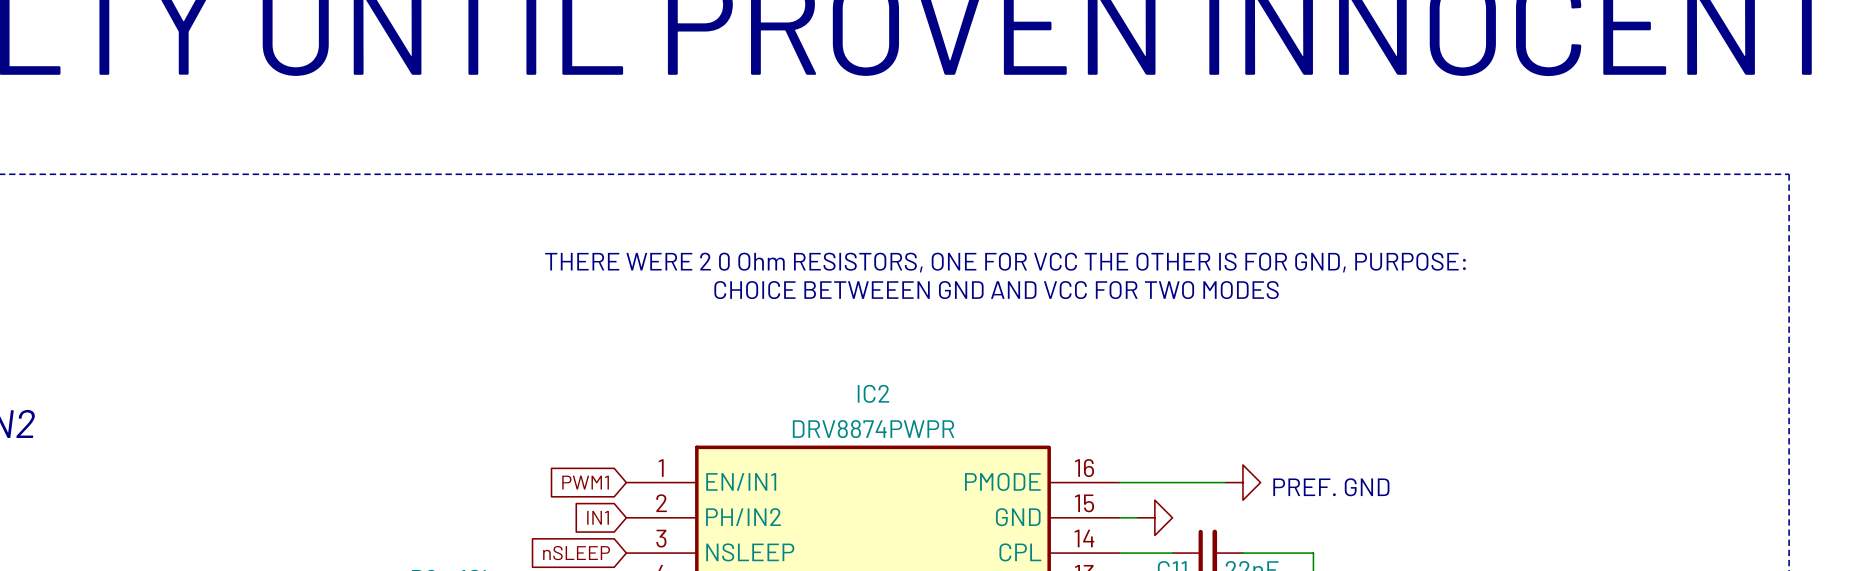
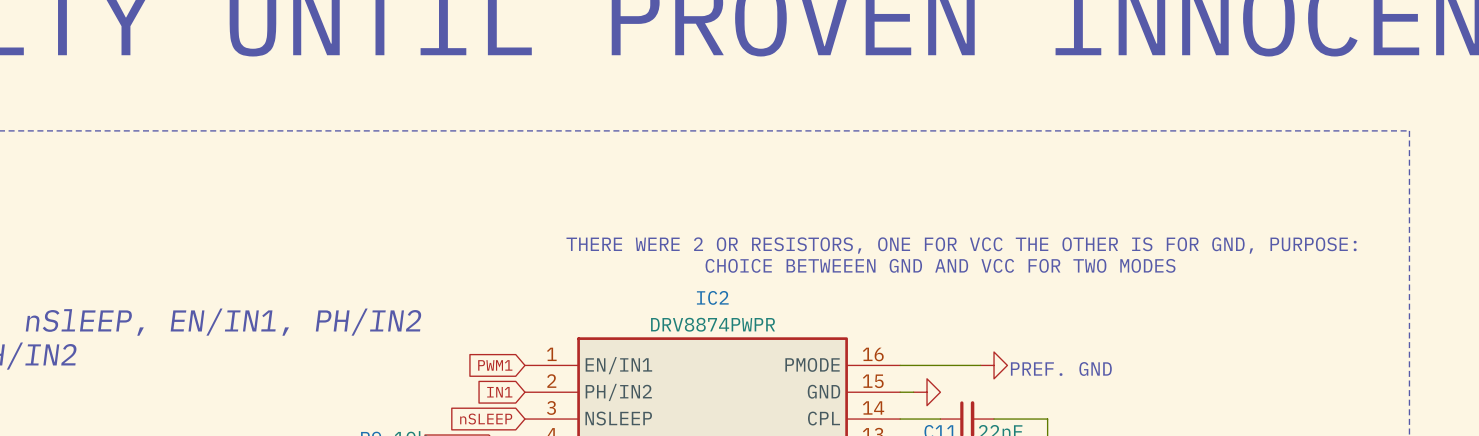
text: THERE WERE 2 0 Ohm RESISTORS, ONE FOR VCC THE OTHER IS FOR GND, PURPOSE: (1005, 262) -> none
text position: CHOICE BETWEEEN GND AND VCC FOR TWO MODES (996, 290) -> CHOICE BETWEEEN GND AND VCC FOR TWO MODES (940, 265)
text: none -> THERE WERE 2 OR RESISTORS, ONE FOR VCC THE OTHER IS FOR GND, PURPOSE: (961, 245)

